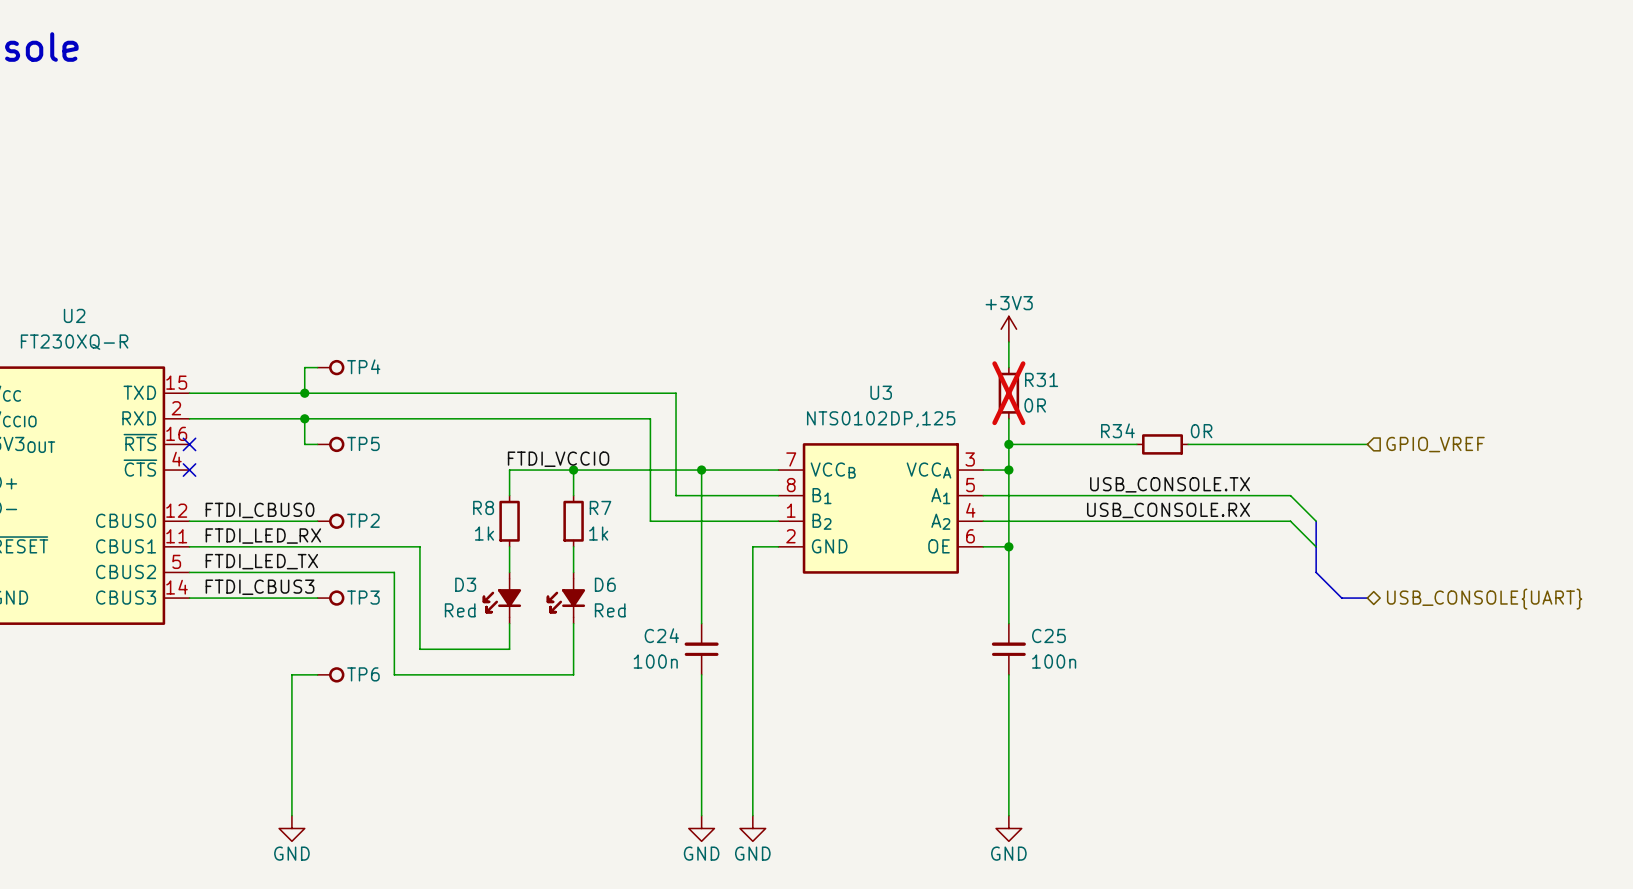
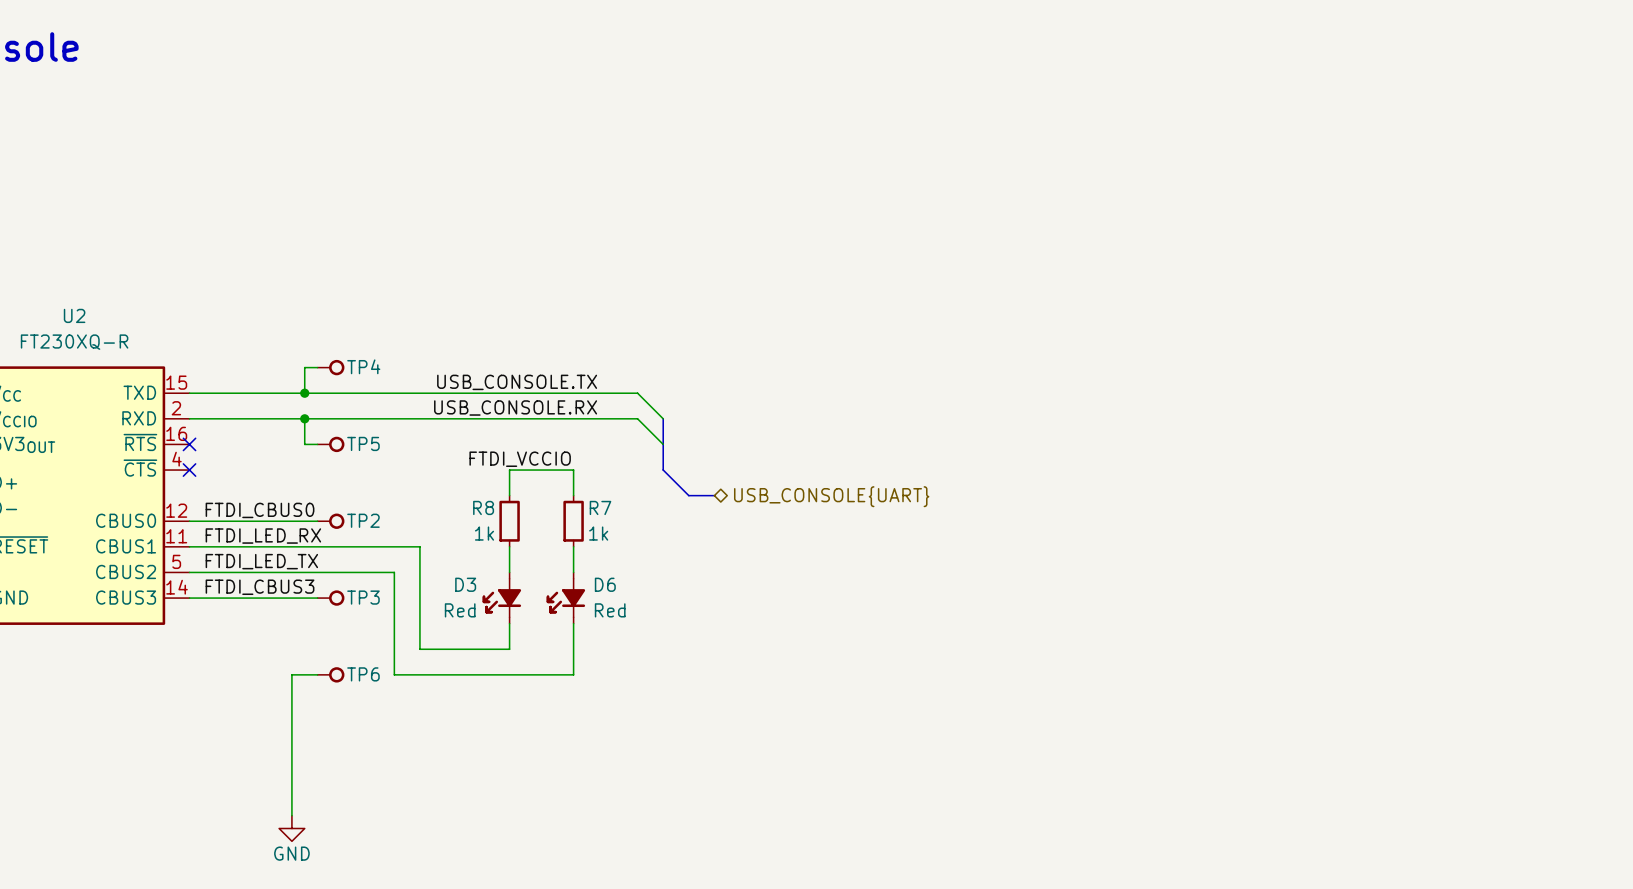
power symbol: +3V3 (1008, 329) -> none
wire: (1008, 342) (1008, 367) -> none
label: none -> USB_CONSOLE.TX (517, 382)
wire: (637, 393) (676, 393) (676, 495) (778, 495) -> (637, 393) (663, 418)
R31: (1008, 393) -> none
label: none -> USB_CONSOLE.RX (515, 408)
wire: (637, 418) (650, 418) (650, 521) (778, 521) -> (637, 418) (663, 444)
bus: none -> (663, 418) (663, 470) (688, 495) (714, 495)
wire: (1008, 418) (1008, 623) -> none
wire: (1008, 444) (1136, 444) -> none
junction: (1008, 444) -> none
R34: (1162, 444) -> none
wire: (1188, 444) (1367, 444) -> none
hierarchical label: GPIO_VREF (1435, 444) -> none
label position: FTDI_VCCIO (558, 459) -> FTDI_VCCIO (520, 459)
wire: (573, 470) (778, 470) -> none
junction: (573, 470) -> none
wire: (701, 470) (701, 623) -> none
junction: (701, 470) -> none
wire: (983, 470) (1008, 470) -> none
junction: (1008, 470) -> none
label: USB_CONSOLE.TX (1170, 484) -> none
wire: (983, 495) (1290, 495) (1316, 521) -> none
hierarchical label: none -> USB_CONSOLE{UART} (831, 496)
U3: (880, 508) -> none
label: USB_CONSOLE.RX (1168, 510) -> none
wire: (983, 521) (1290, 521) (1316, 546) -> none
bus: (1316, 521) (1316, 572) (1341, 598) (1367, 598) -> none
wire: (778, 546) (752, 546) (752, 815) -> none
wire: (983, 546) (1008, 546) -> none
junction: (1008, 546) -> none
hierarchical label: USB_CONSOLE{UART} (1484, 599) -> none
C24: (701, 649) -> none
C25: (1008, 649) -> none
wire: (701, 674) (701, 815) -> none
wire: (1008, 674) (1008, 815) -> none
power symbol: GND (701, 828) -> none
power symbol: GND (752, 828) -> none
power symbol: GND (1008, 828) -> none

